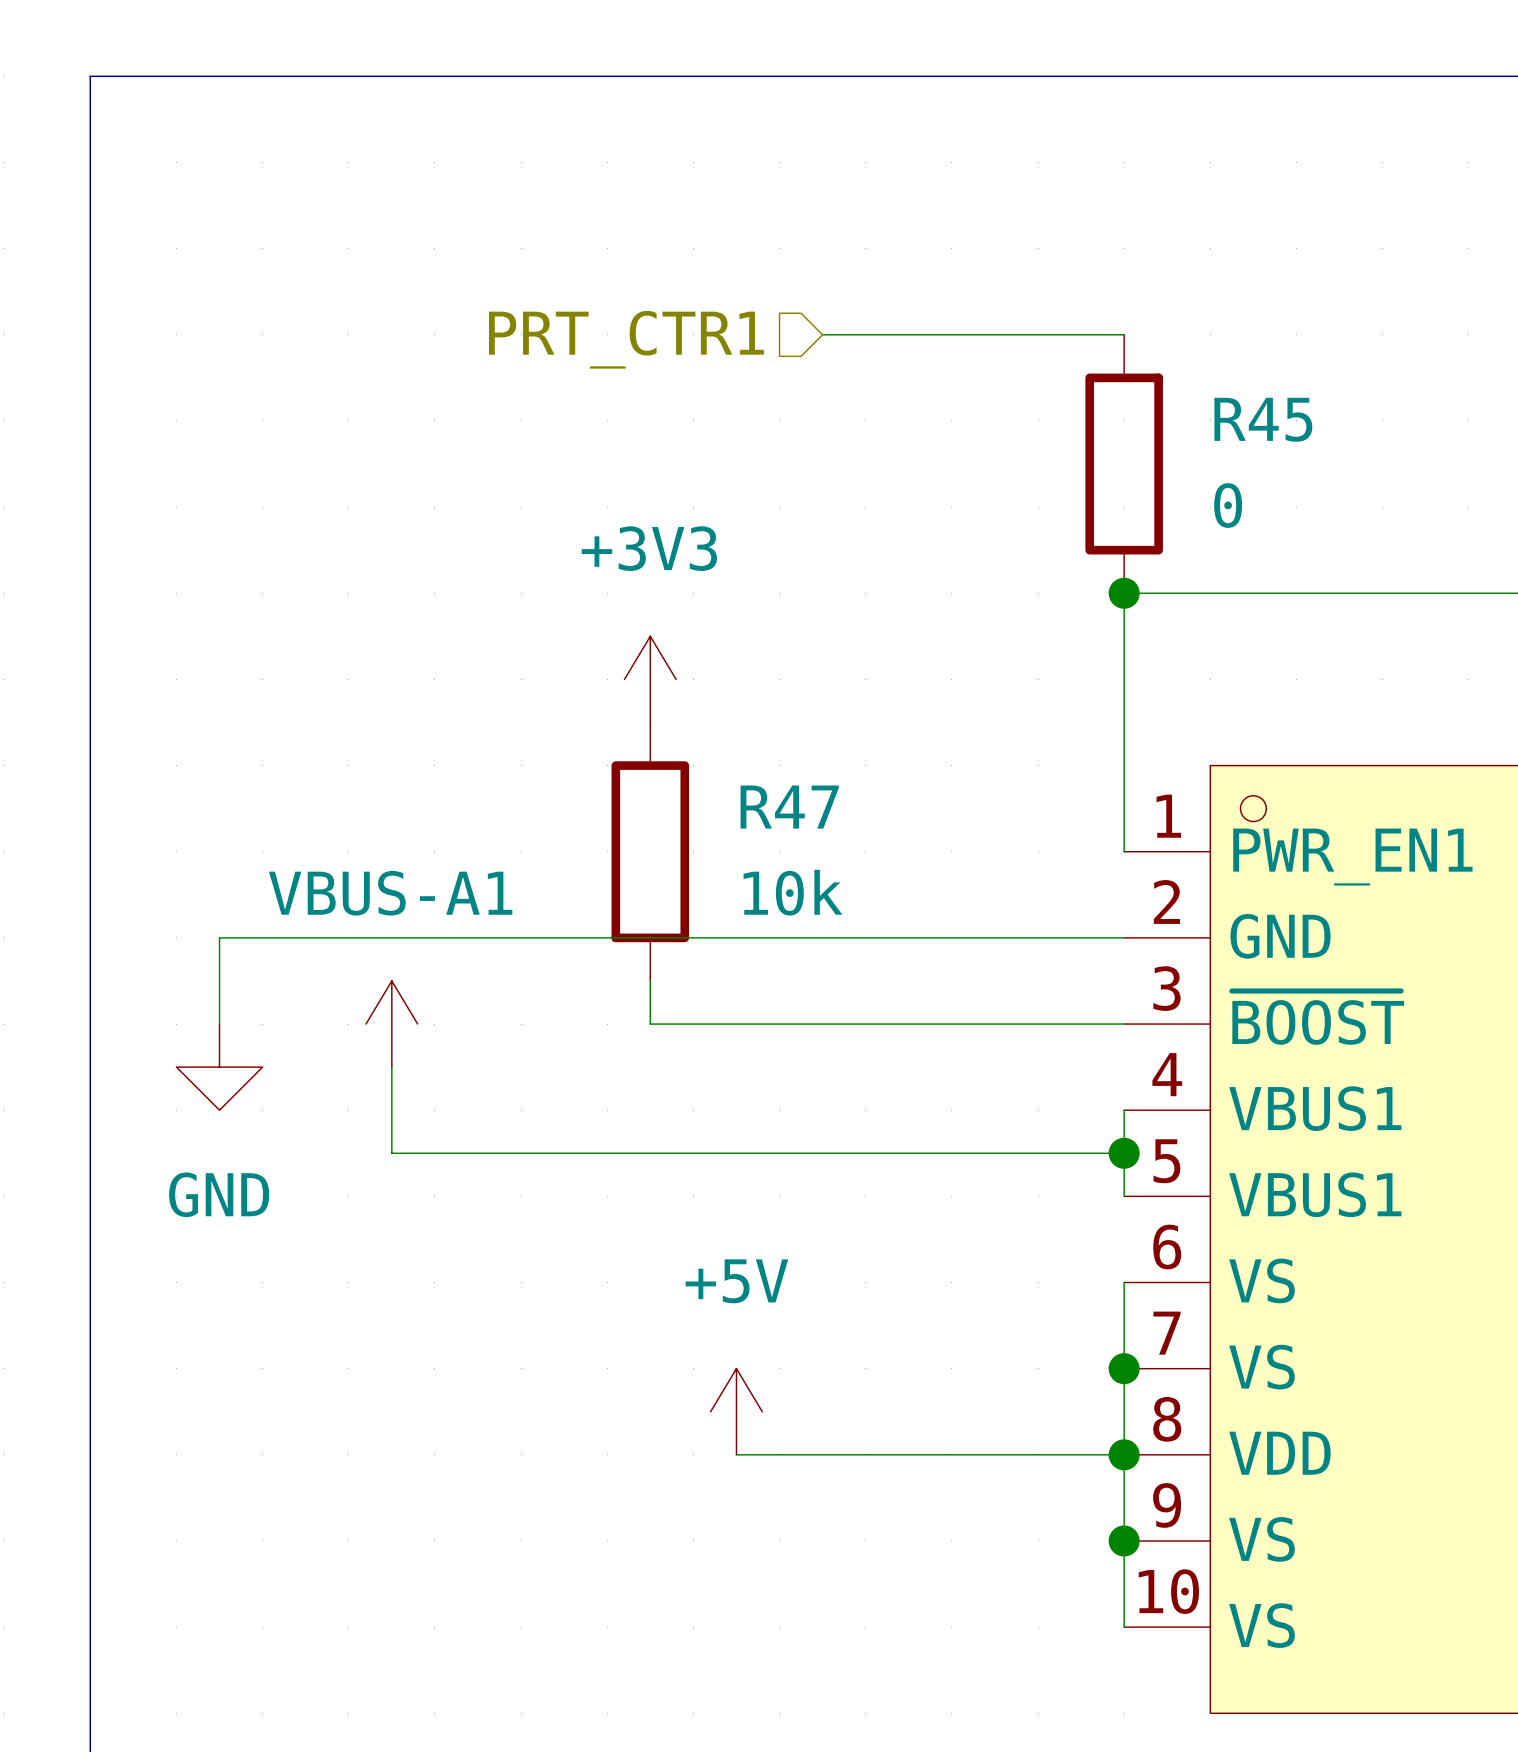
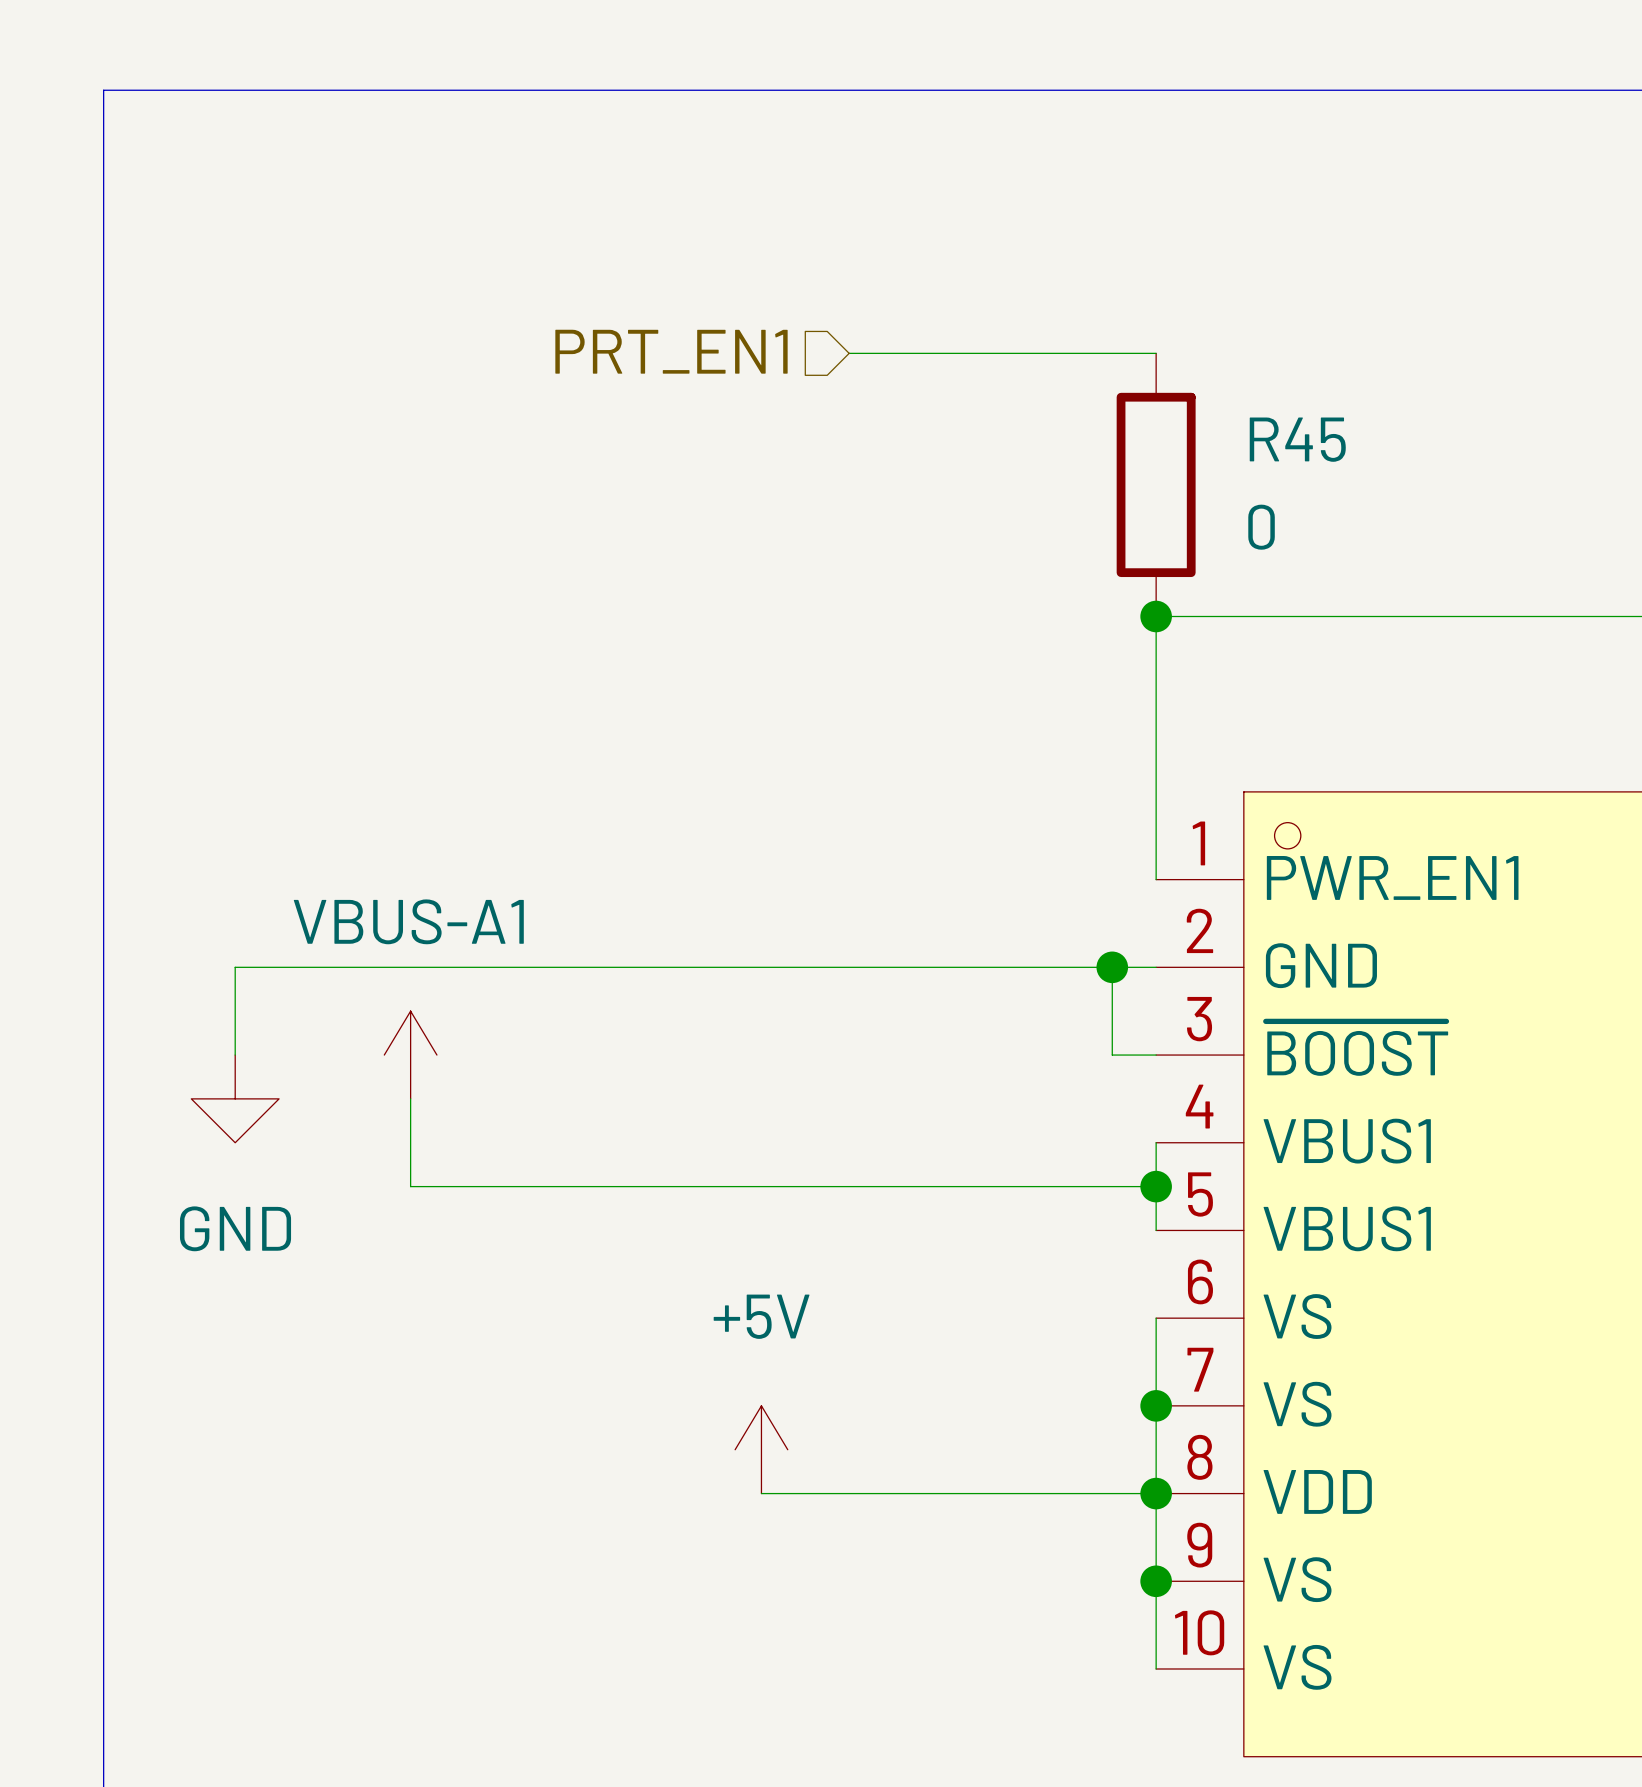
hierarchical label: PRT_CTR1 (626, 339) -> PRT_EN1 (671, 351)
power symbol: +3V3 (650, 679) -> none
R47: 10k (650, 851) -> none
junction: none -> (1112, 967)
wire: (650, 980) (650, 1024) (1081, 1024) -> (1112, 967) (1112, 1055)

